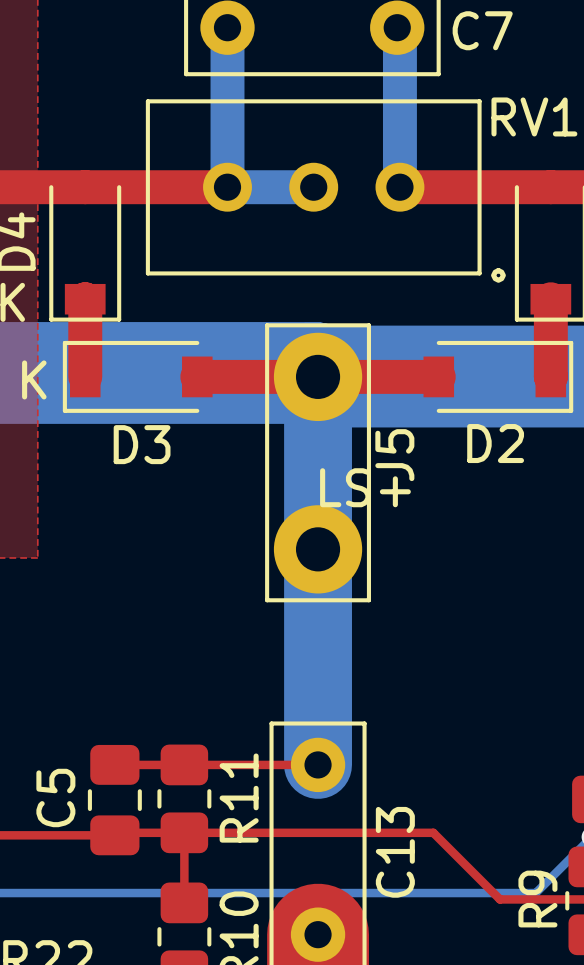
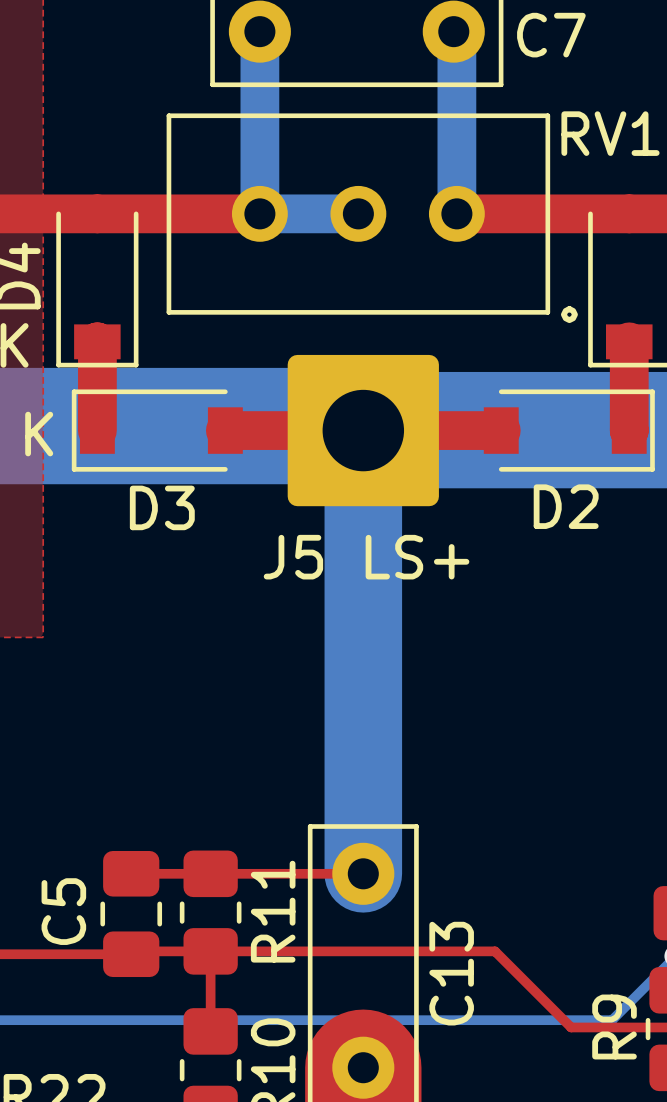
J5 footprint: [265, 323, 371, 603] -> [287, 354, 439, 507]
J5 name position: J5 (394, 455) -> J5 (293, 557)

